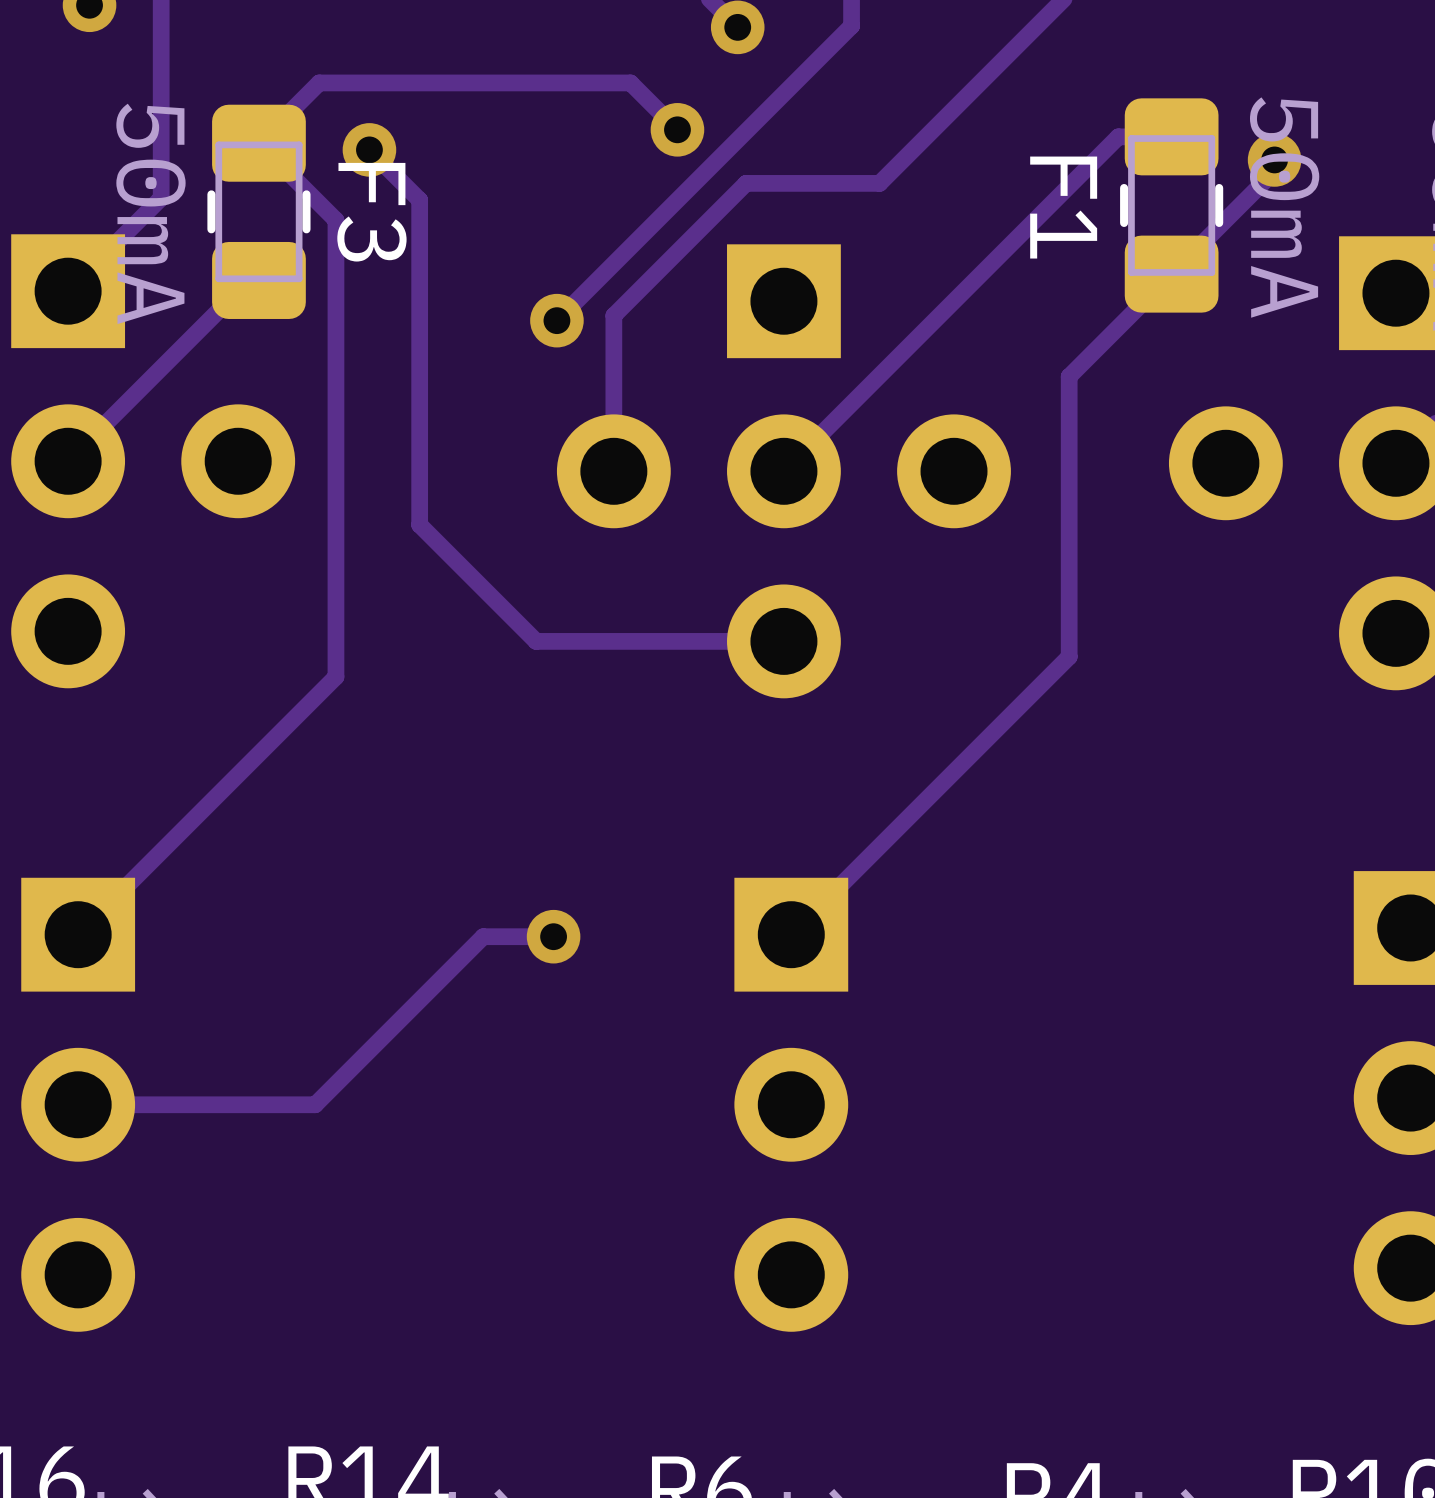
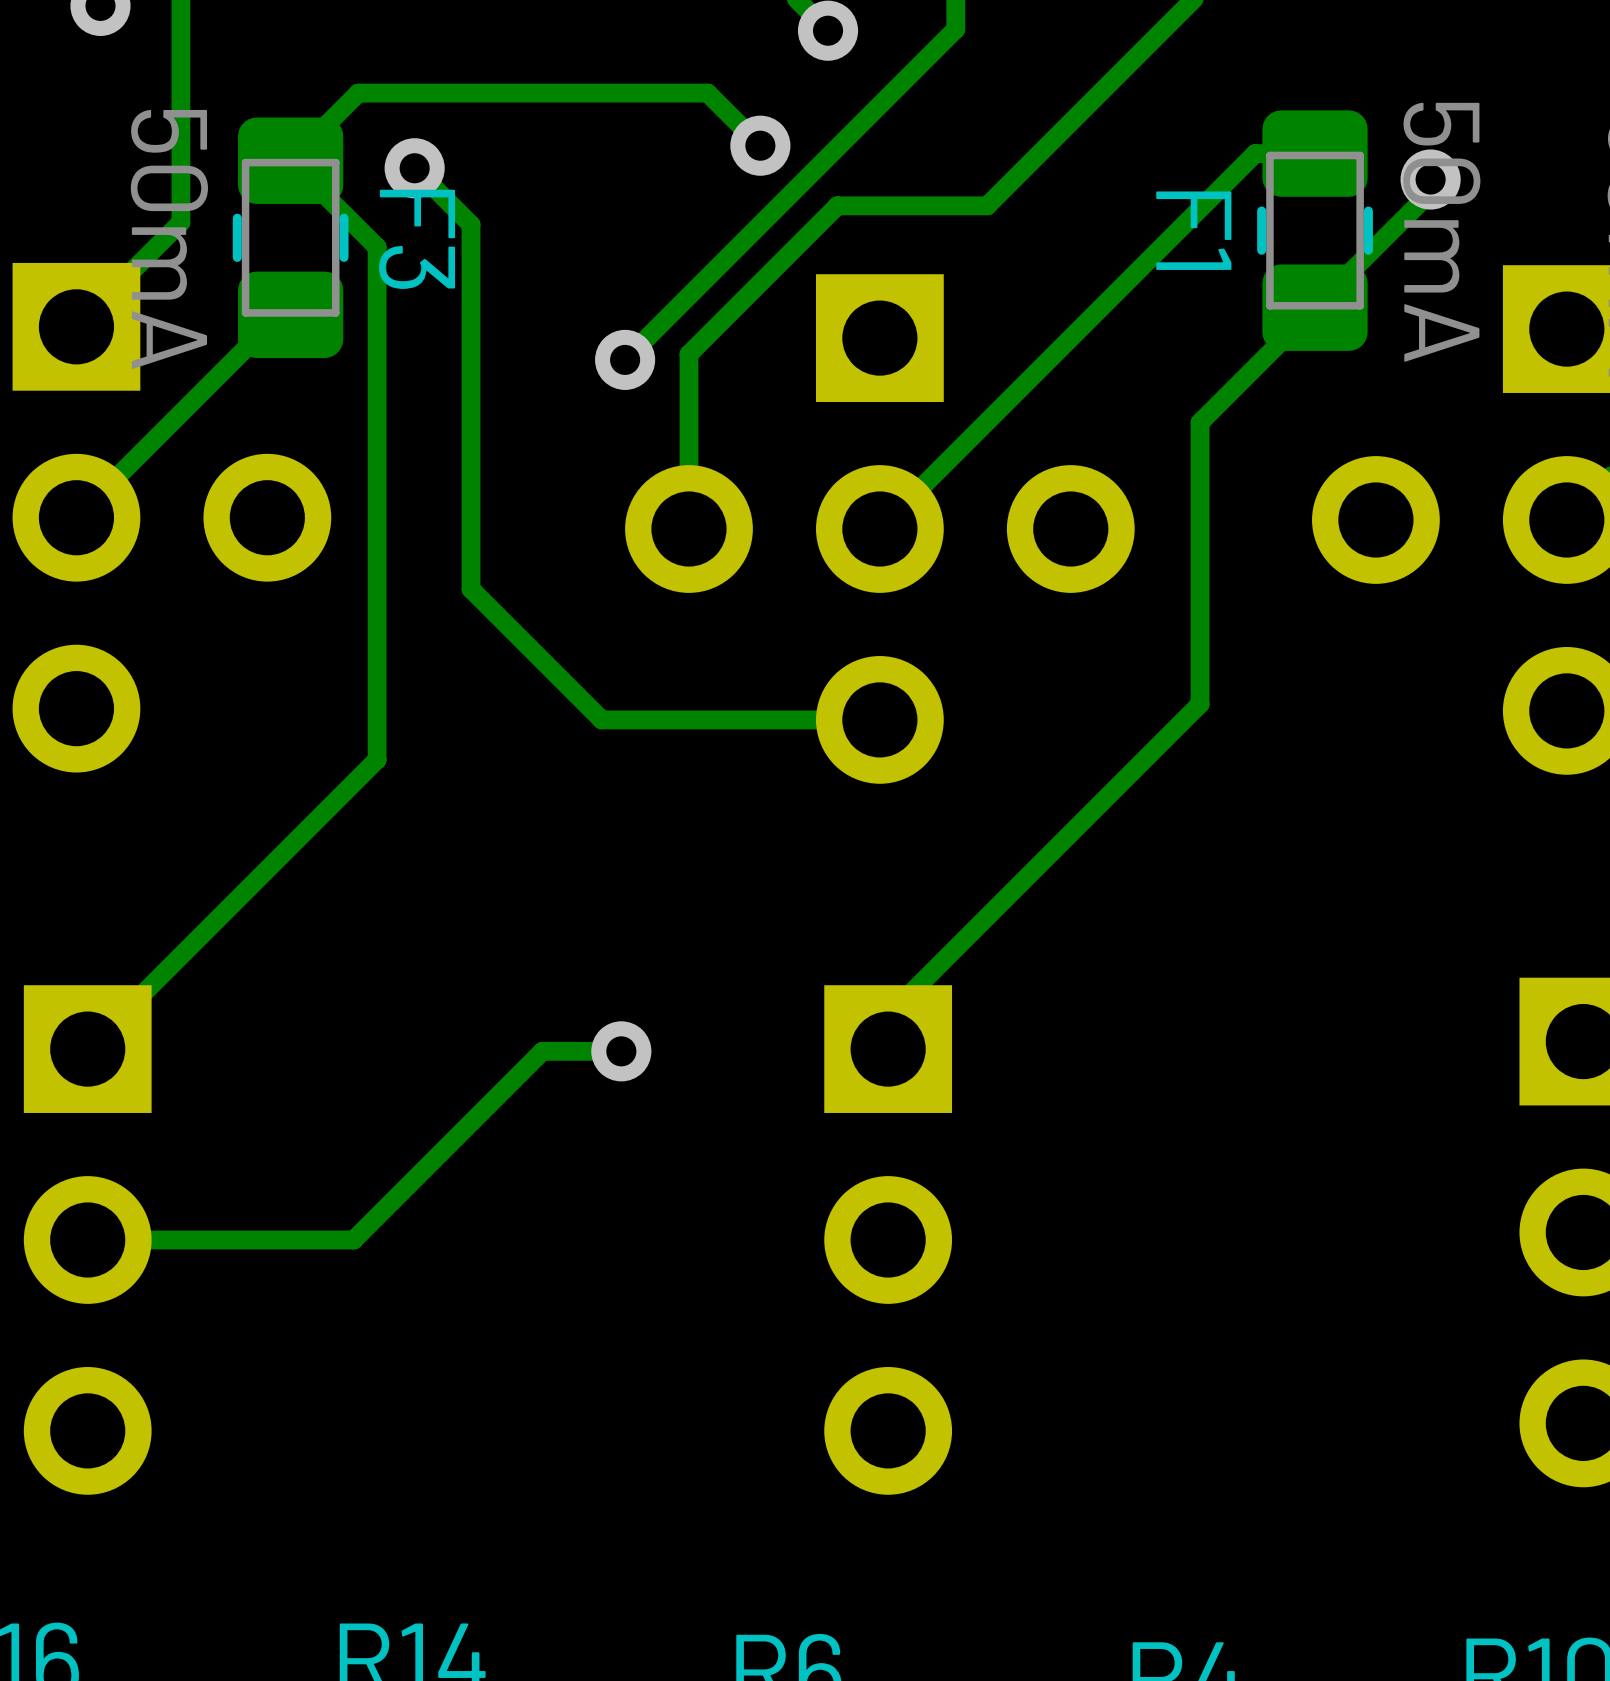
track: (1069, 627) (1069, 656) (791, 934) -> (1200, 704) (850, 1053)

